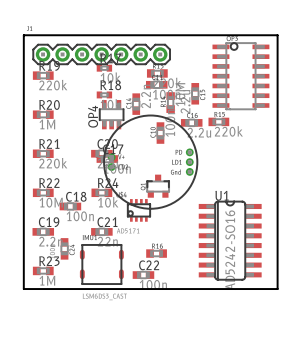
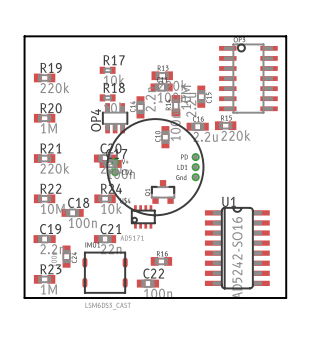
part: (101, 54) -> none

